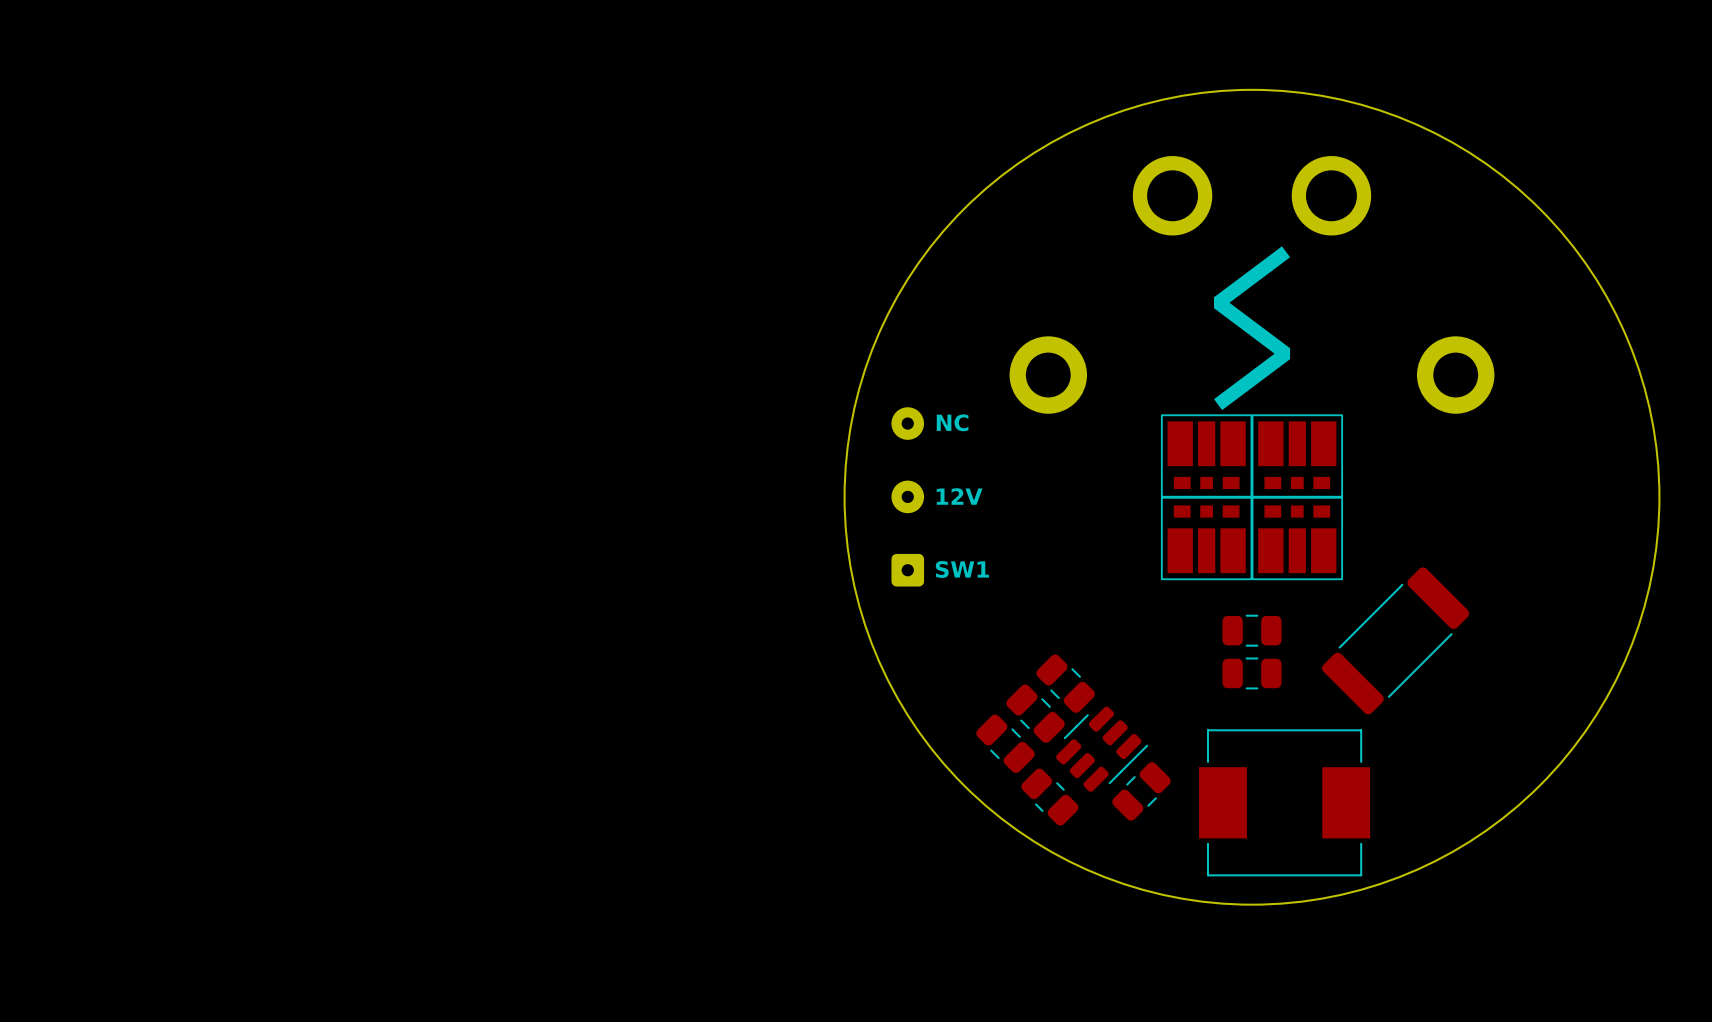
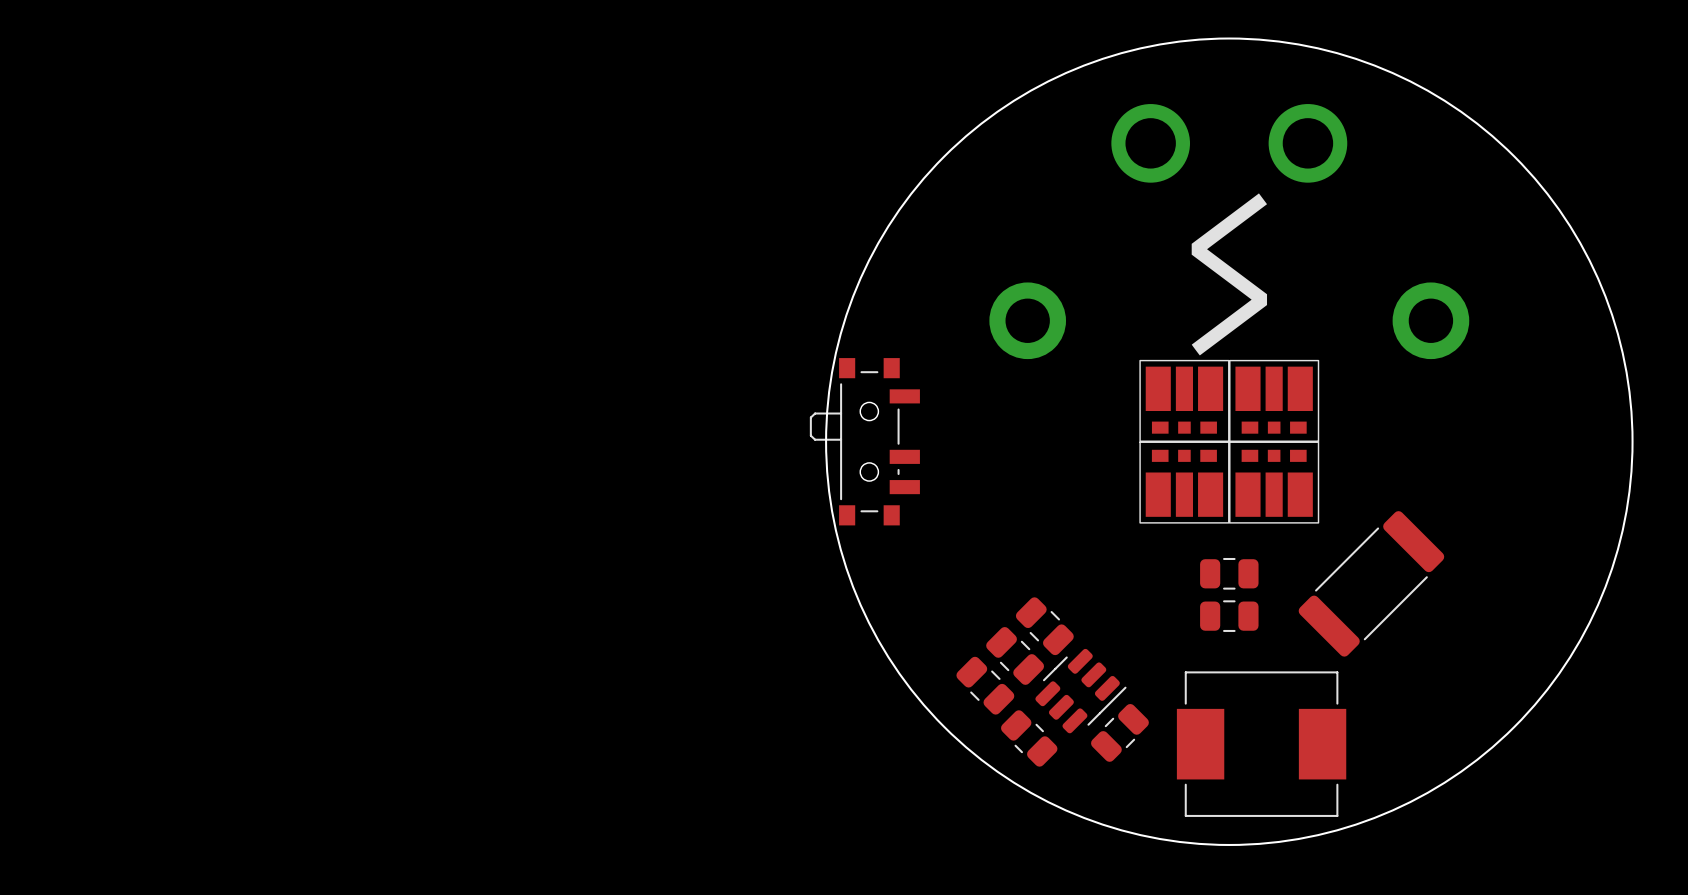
text: NC (952, 422) -> none
part: (907, 496) -> none
text: 12V (959, 496) -> none
part: none -> (864, 441)
text: SW1 (962, 569) -> none

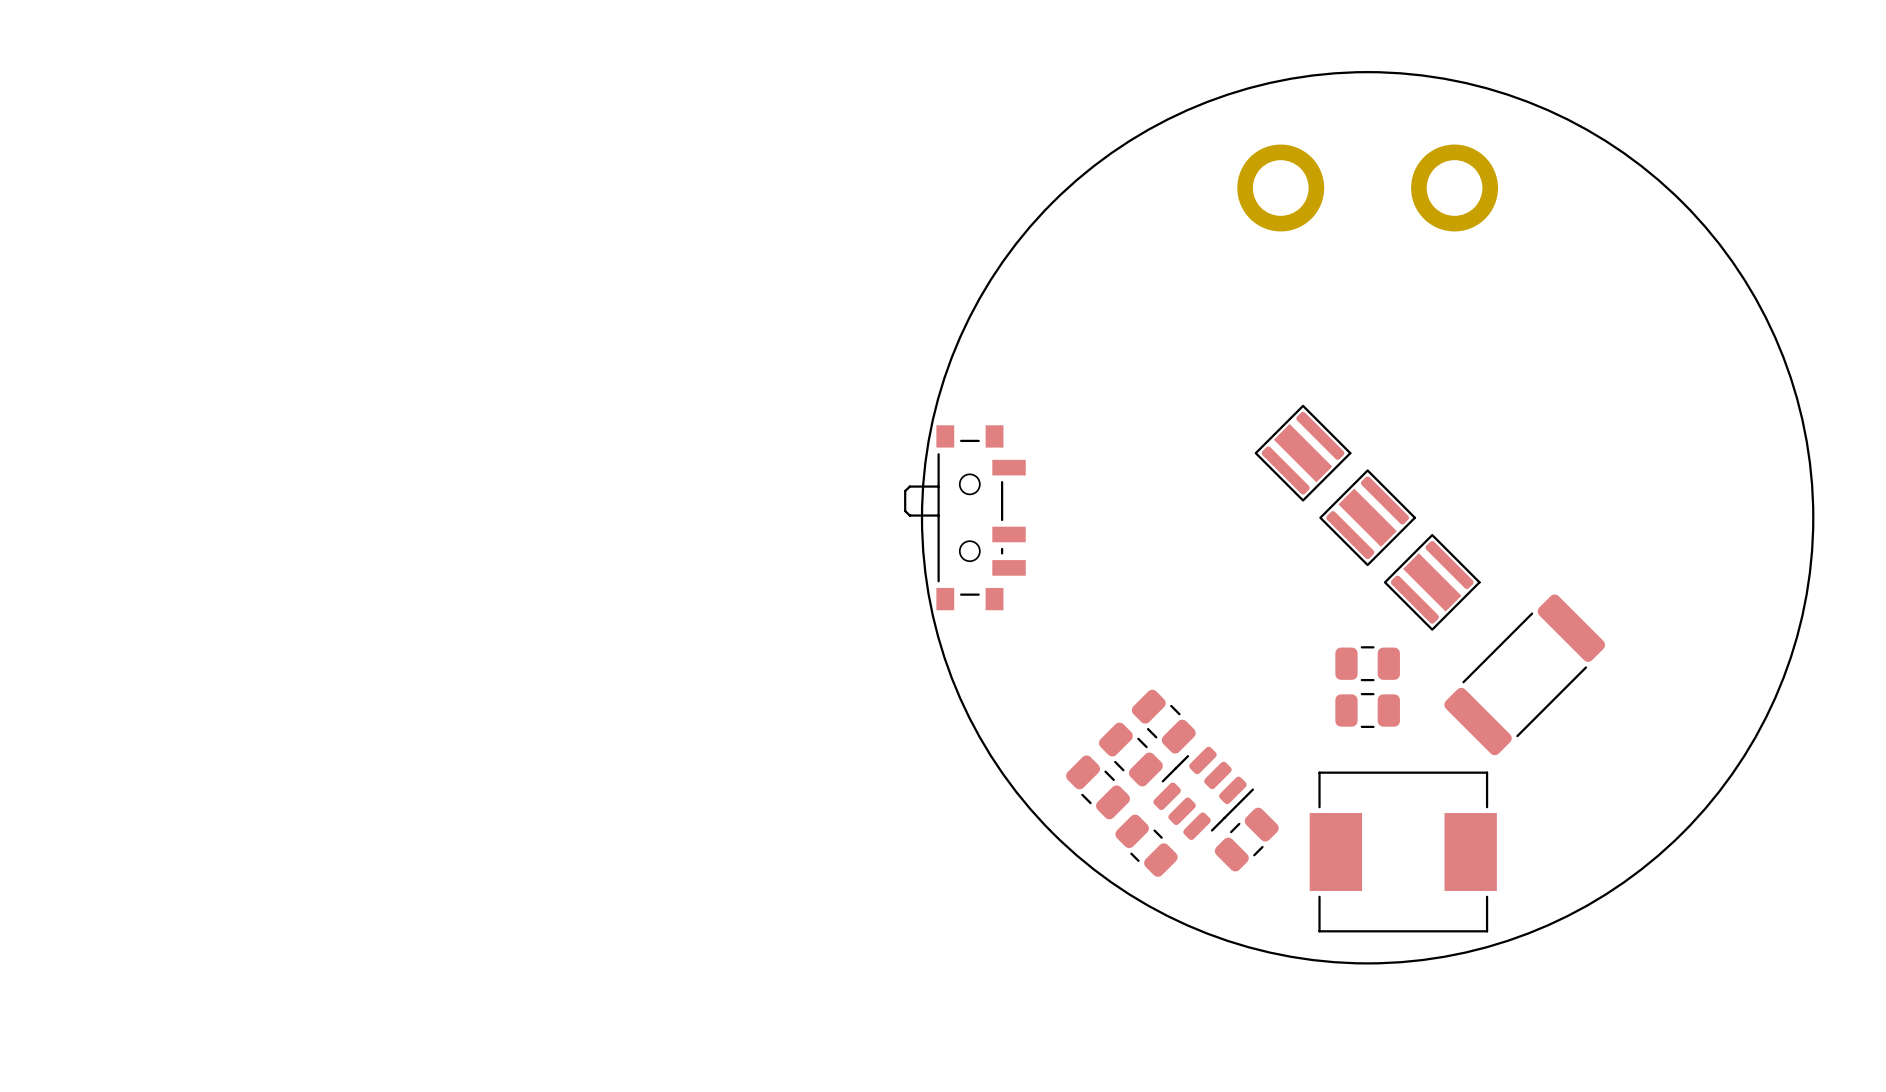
drawing: [1191, 193, 1268, 356] -> none
part: (1027, 320) -> none
part: (1430, 320) -> none
part: none -> (1303, 453)
part: (1184, 400) -> none
part: (1274, 400) -> none
part: none -> (1367, 517)
part: (1184, 482) -> none
part: (1274, 482) -> none
part: none -> (1432, 582)

